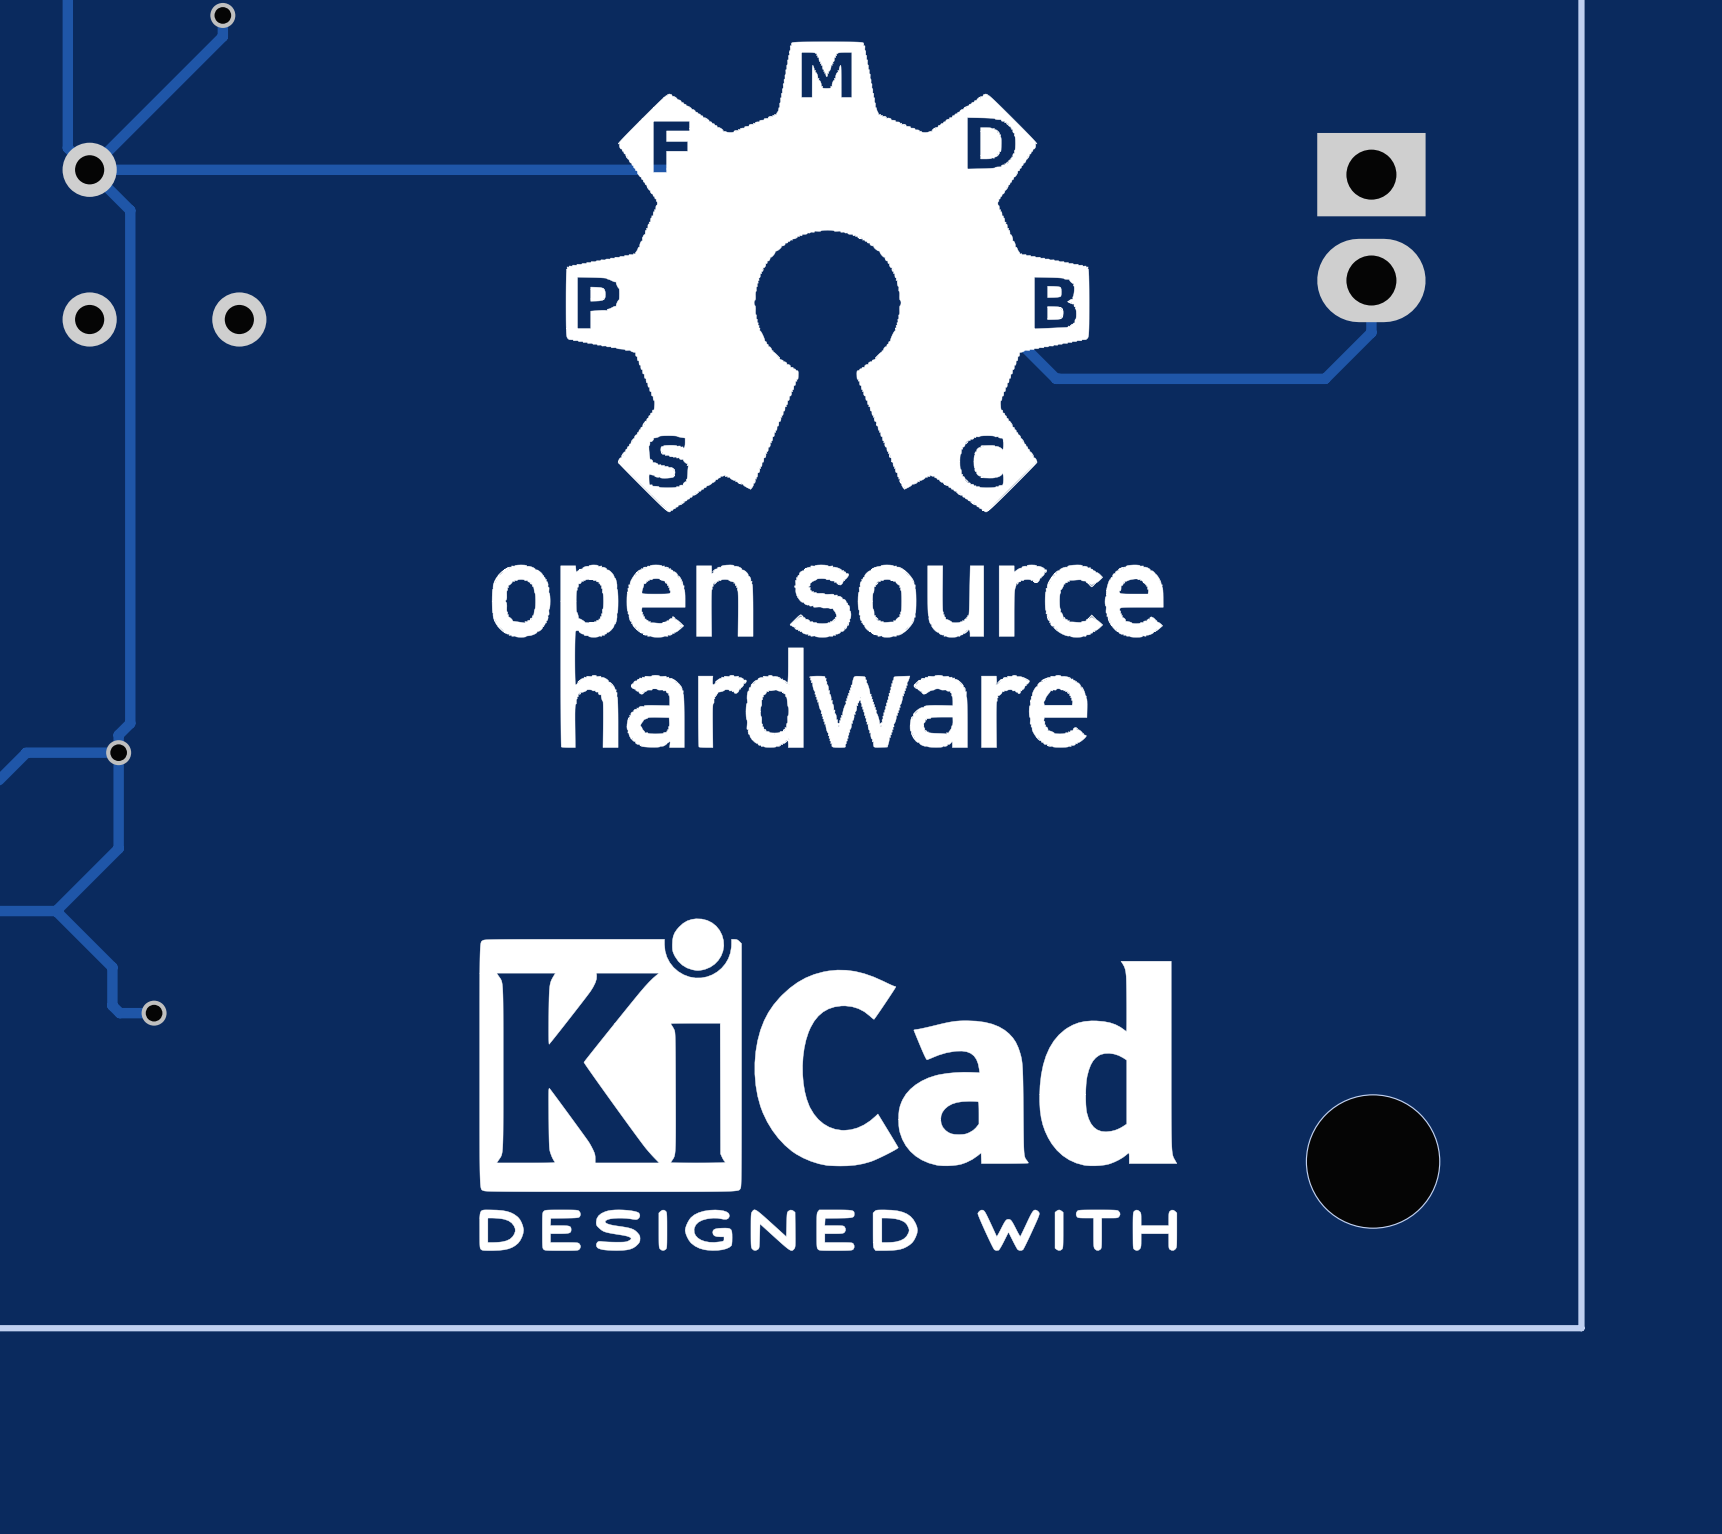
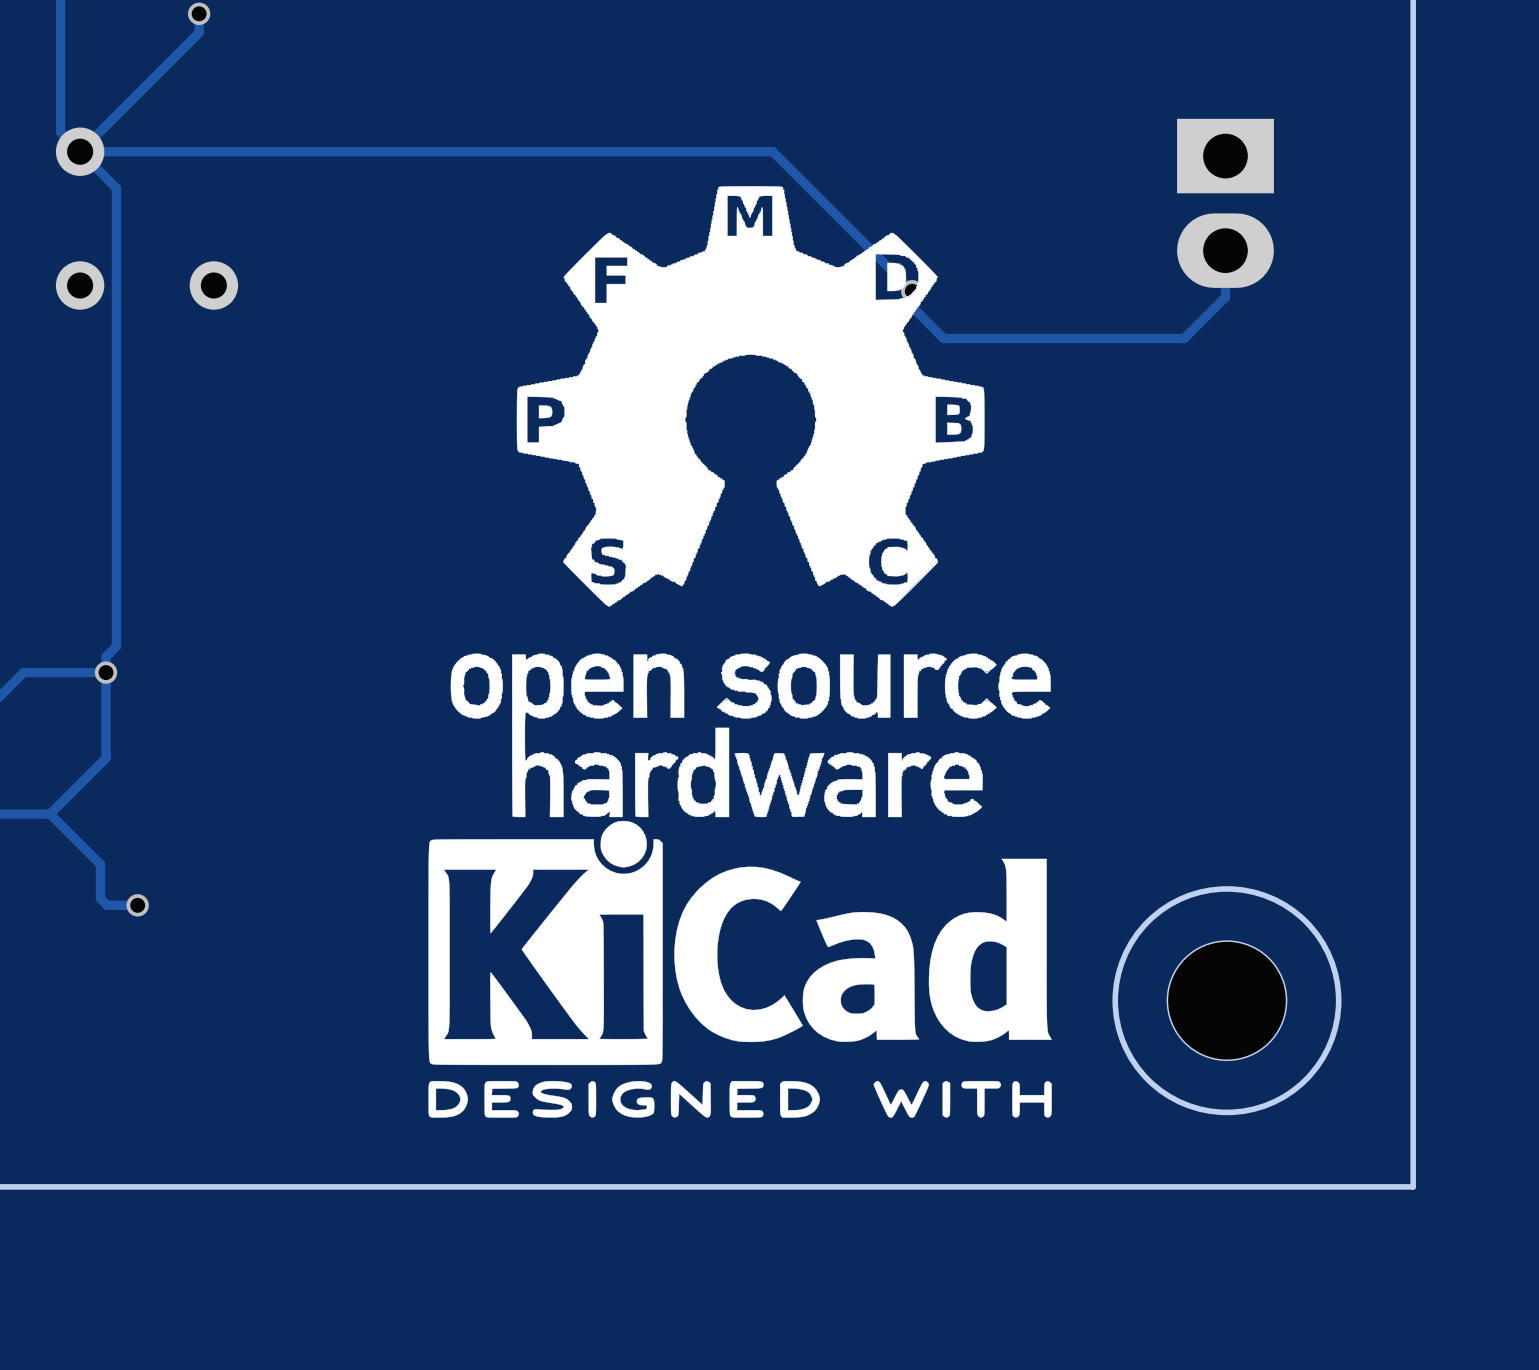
drawing position: (827, 394) -> (750, 501)
round board edge: none -> [1112, 886, 1342, 1116]
part position: (1373, 1161) -> (1226, 1000)

